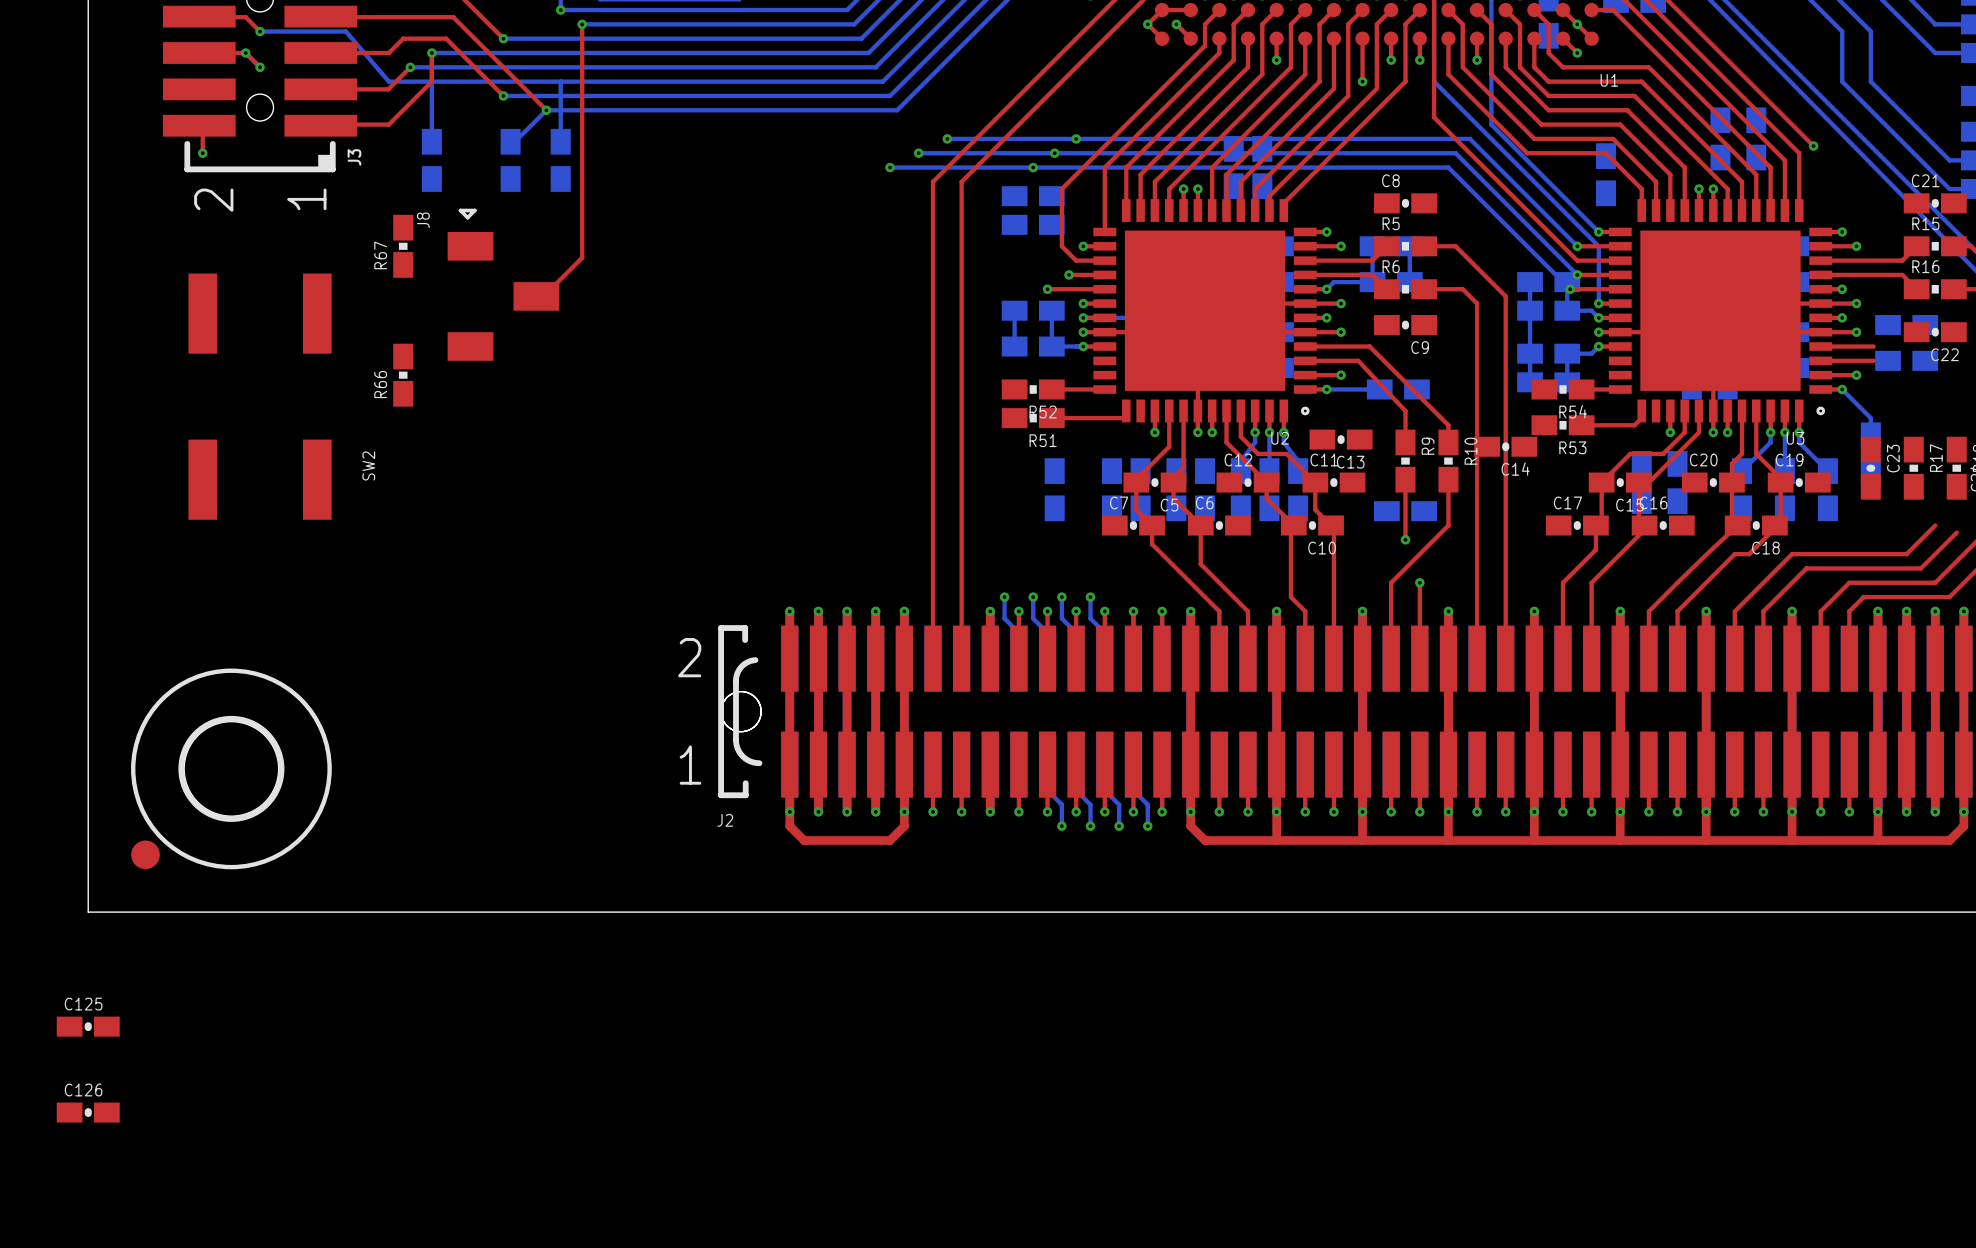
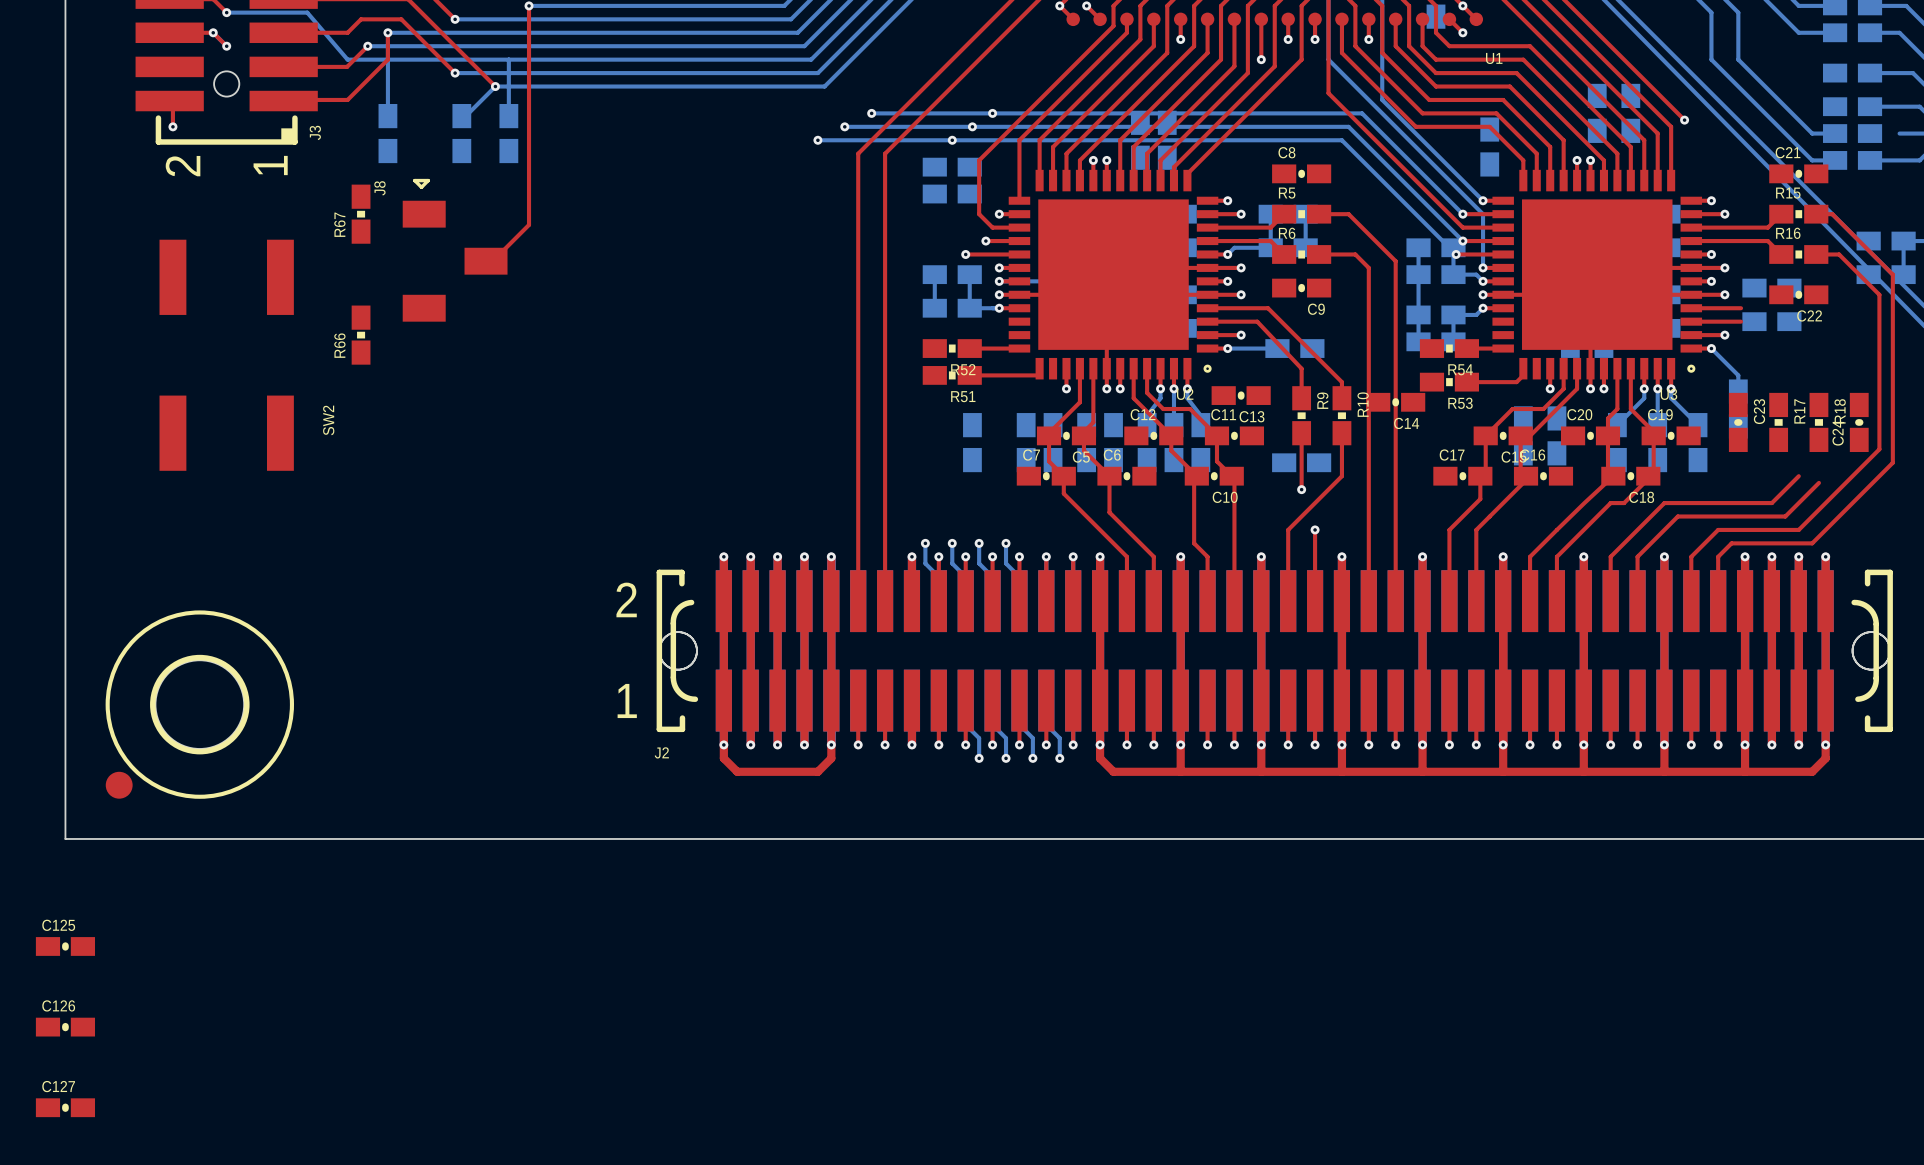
C127: none -> (65, 1107)

